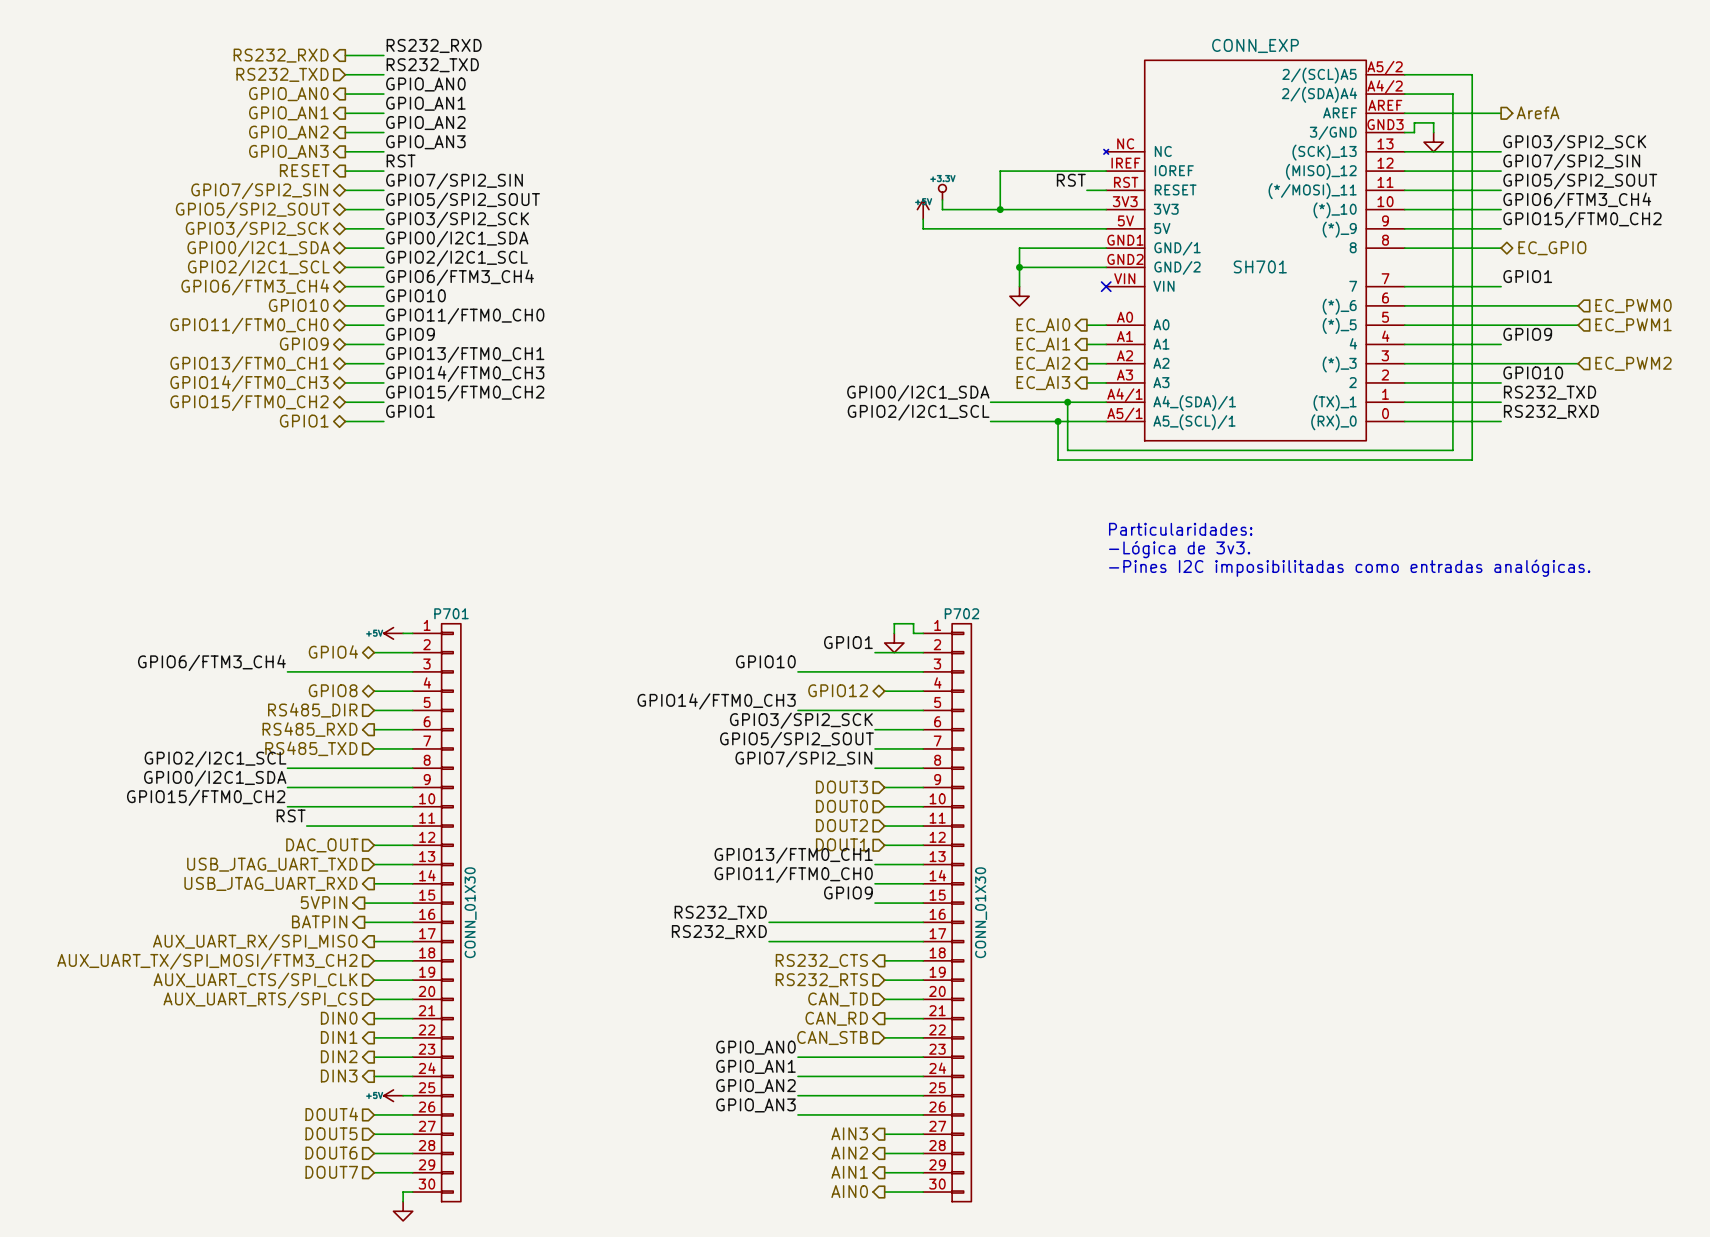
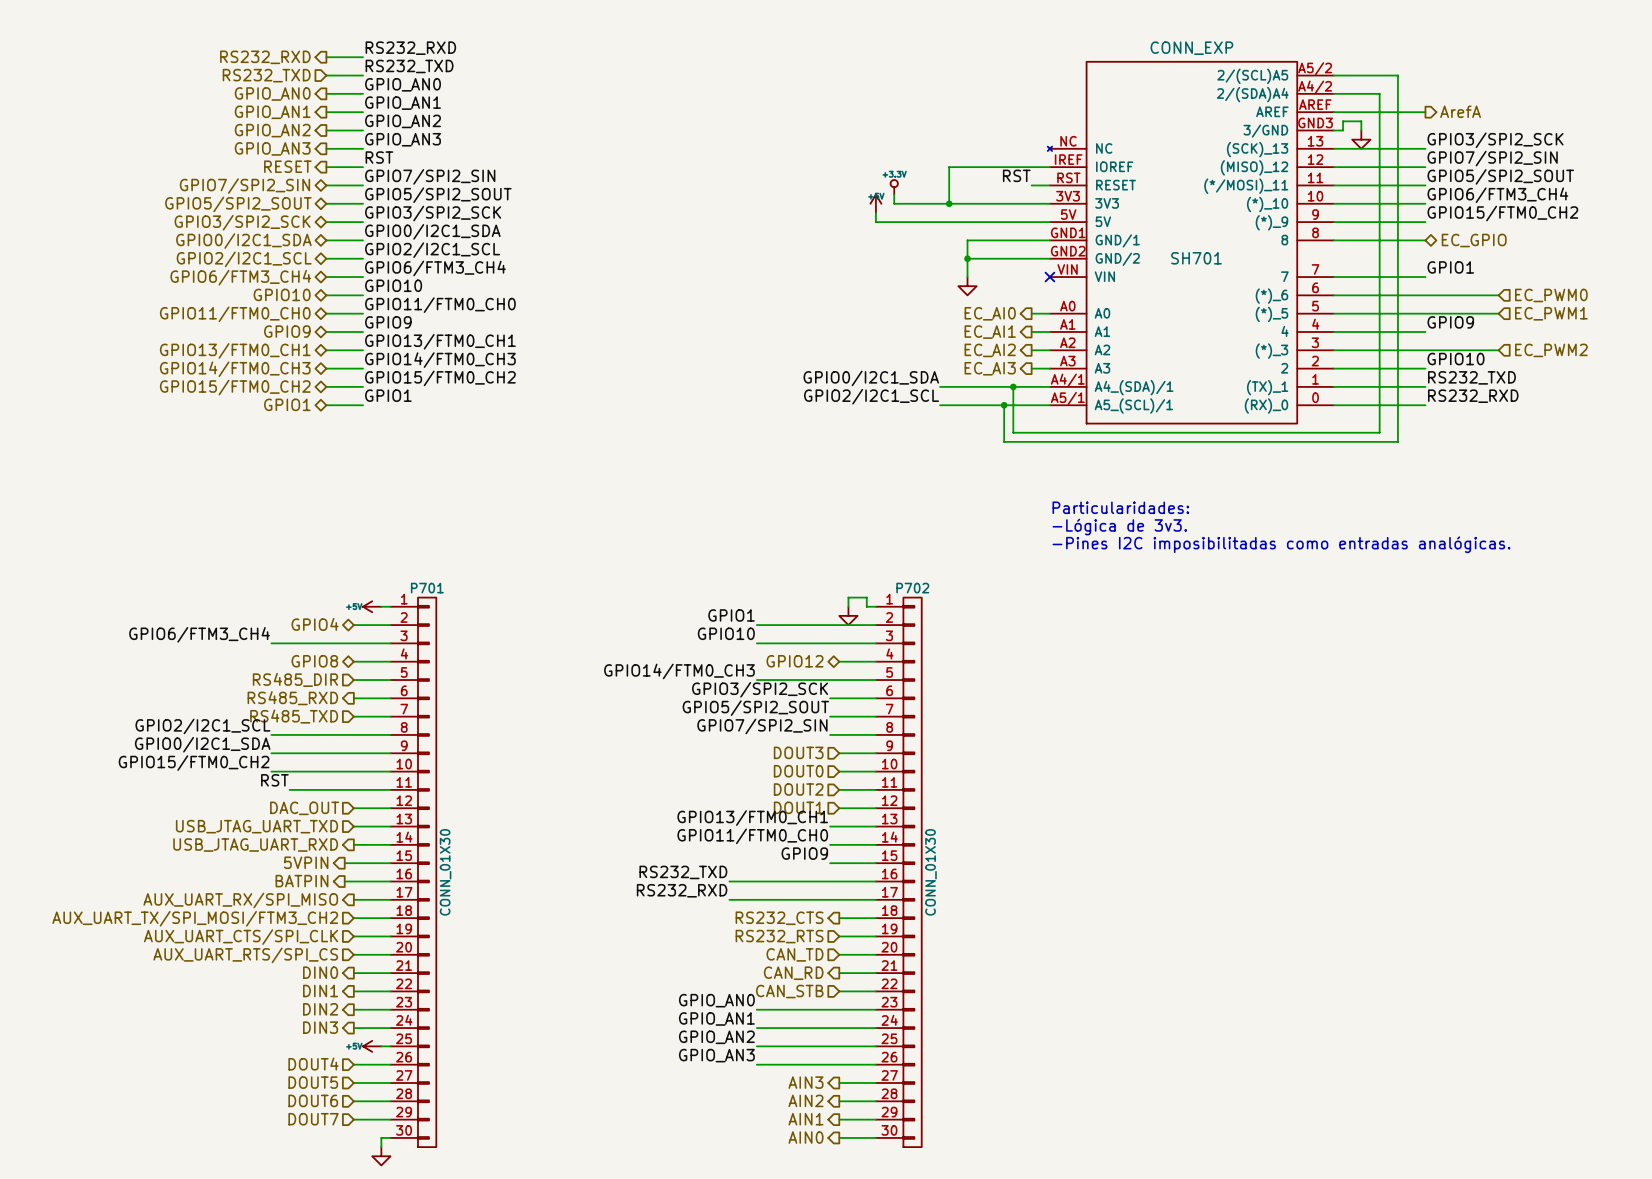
label position: GPIO1 (848, 642) -> GPIO1 (731, 615)
wire: none -> (756, 625) (830, 625)

